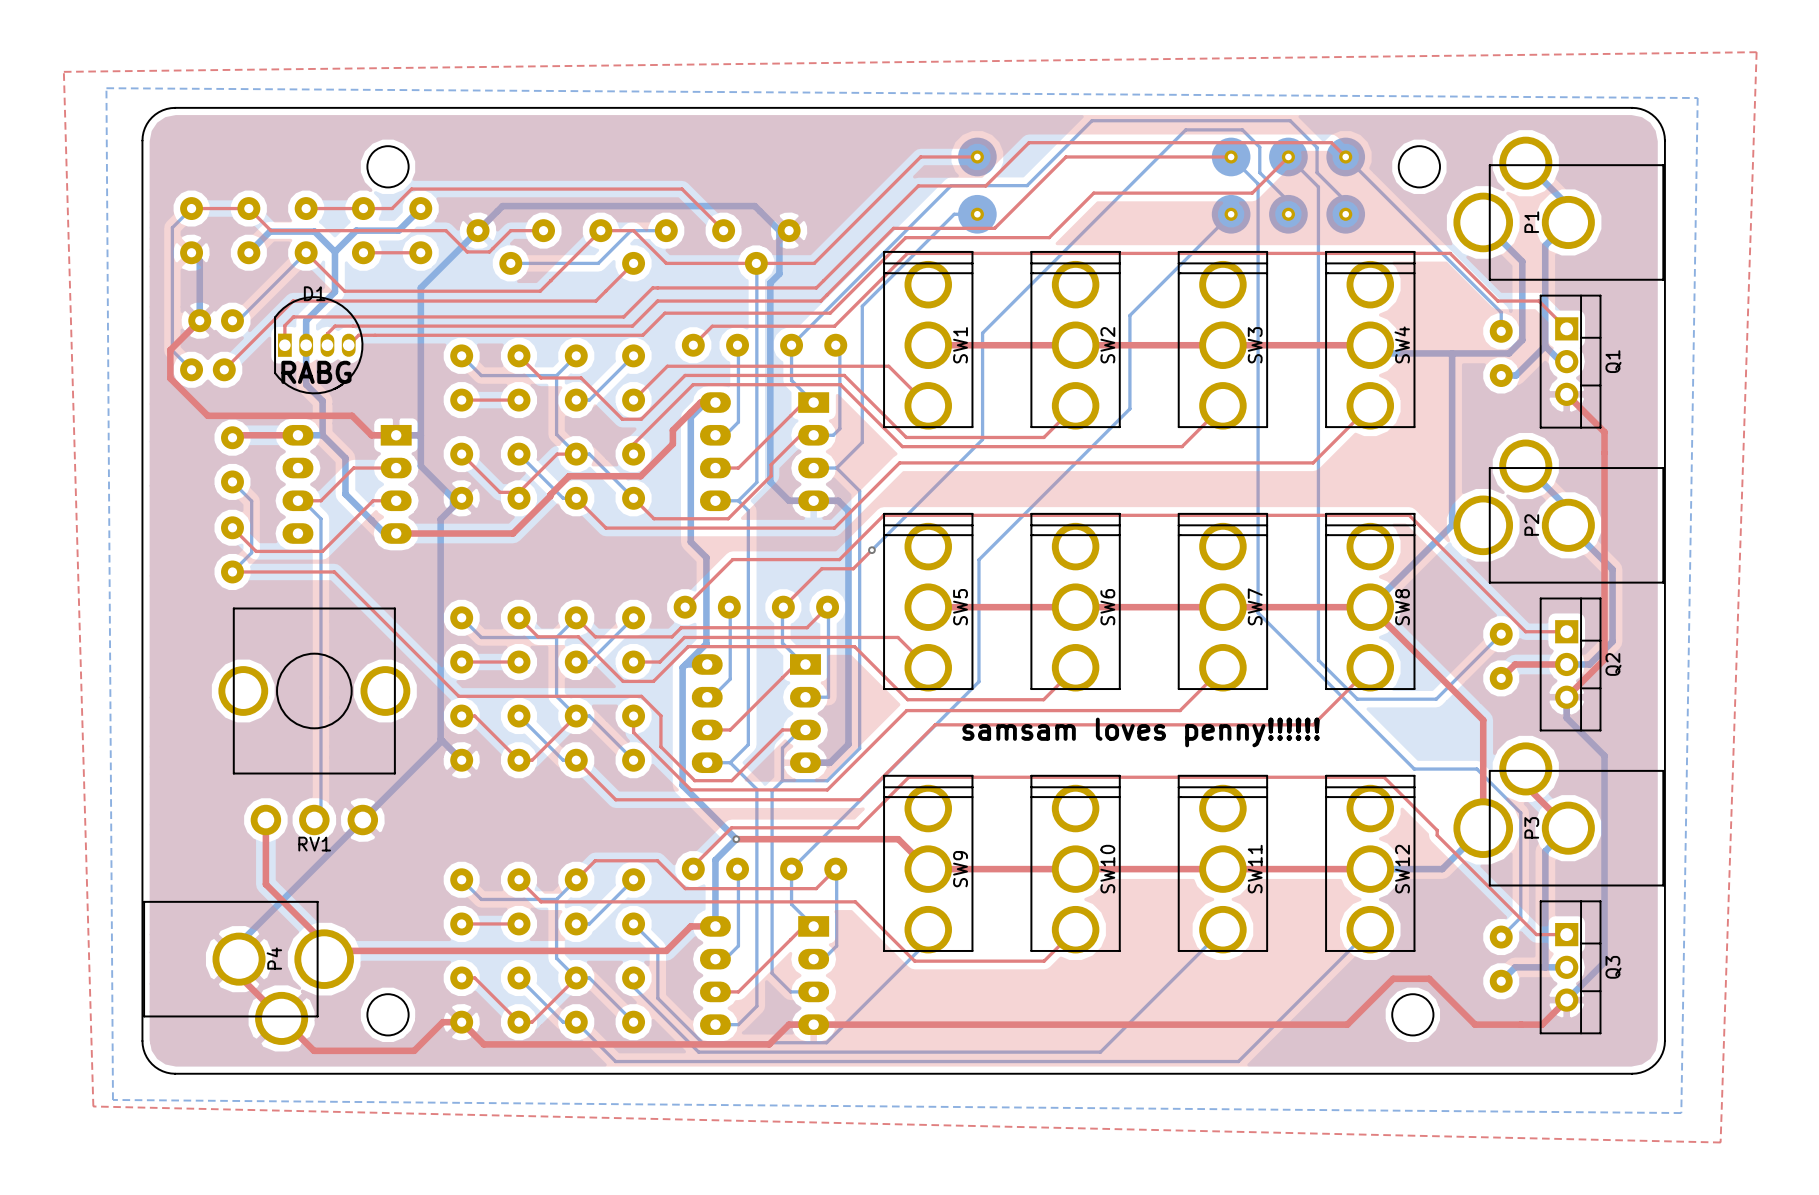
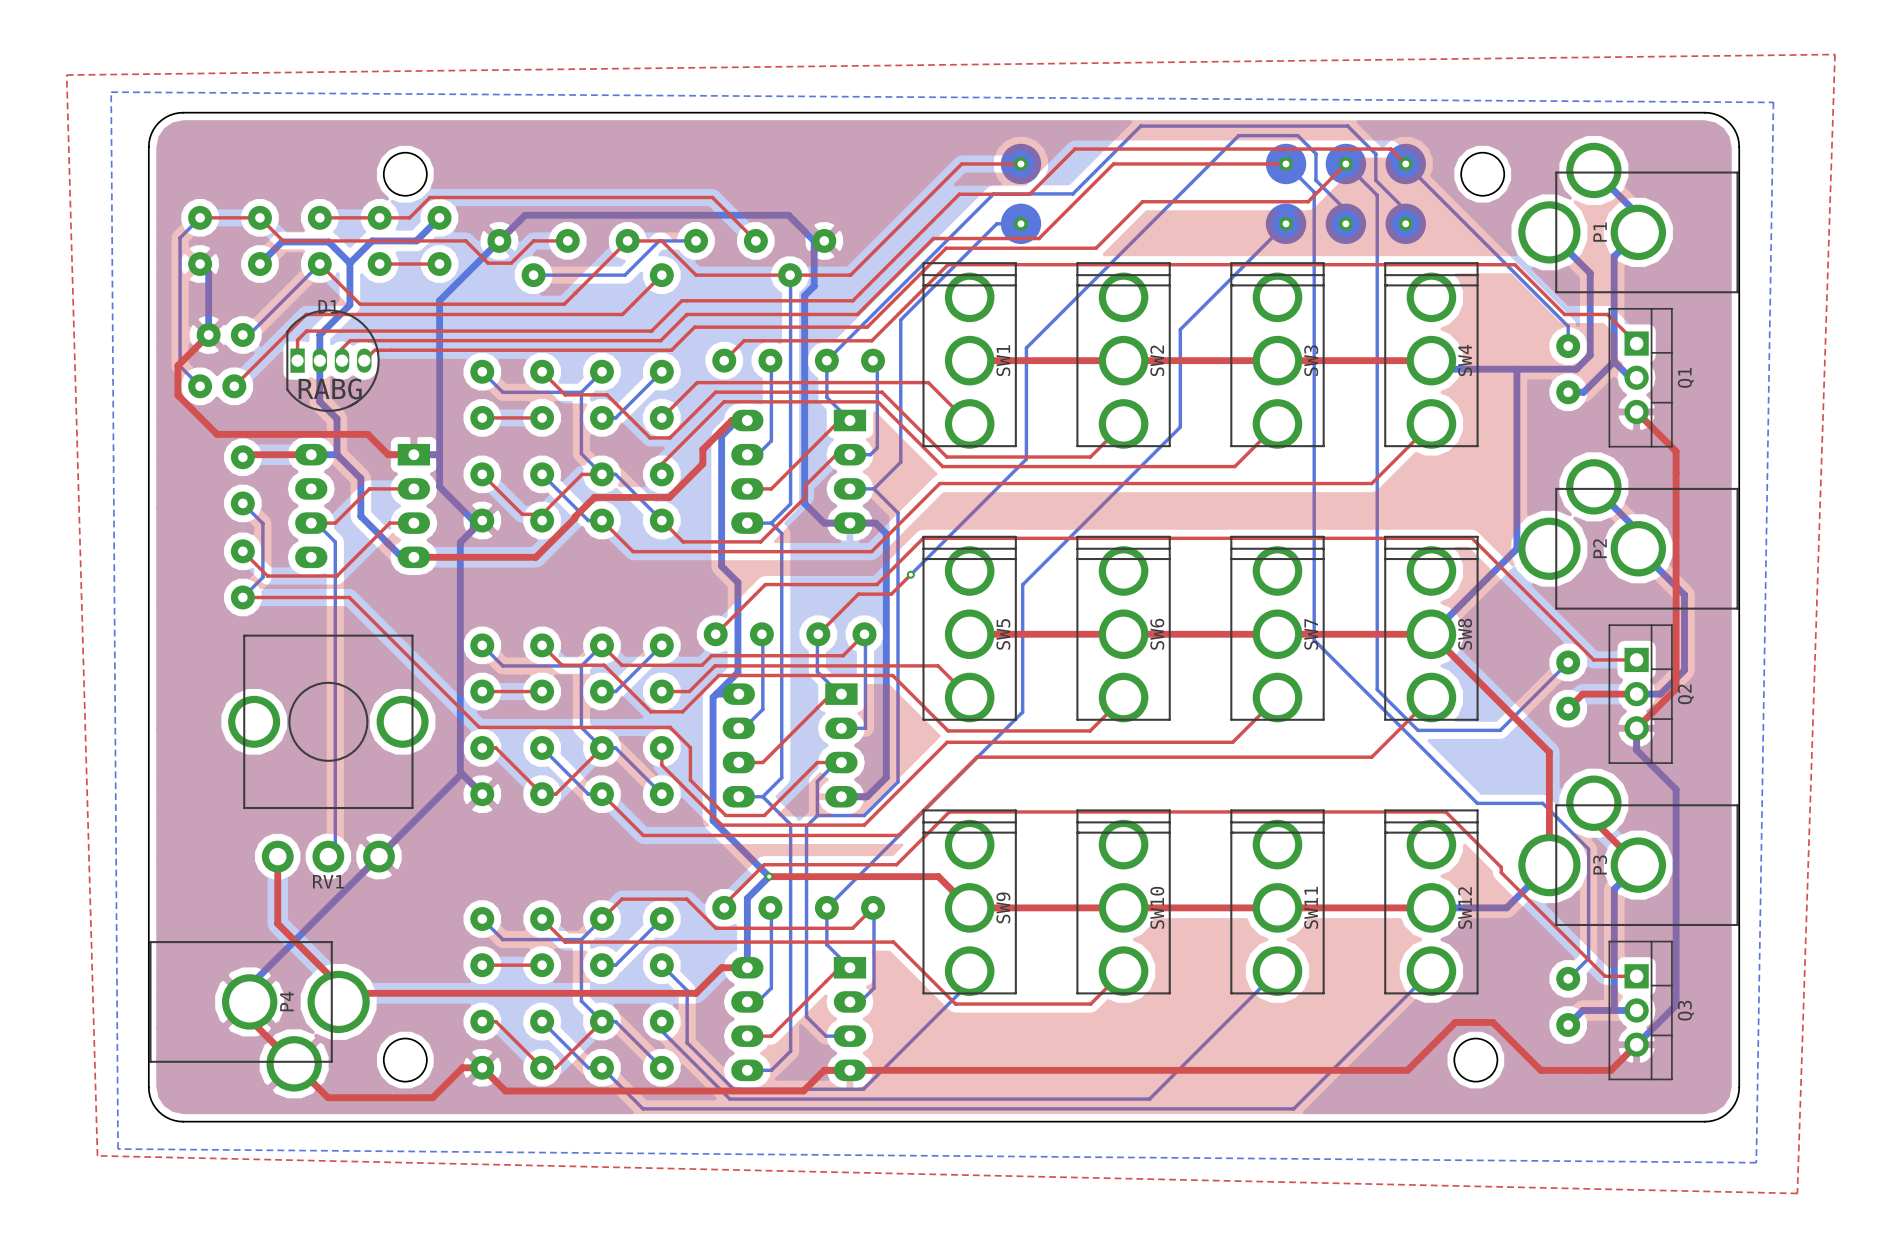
text: samsam loves penny!!!!!! (1141, 732) -> none

